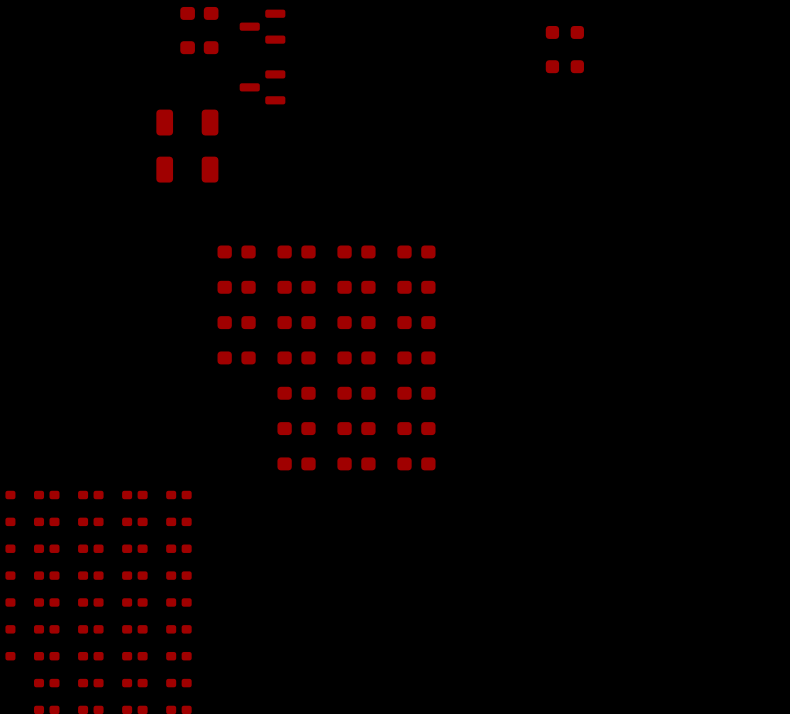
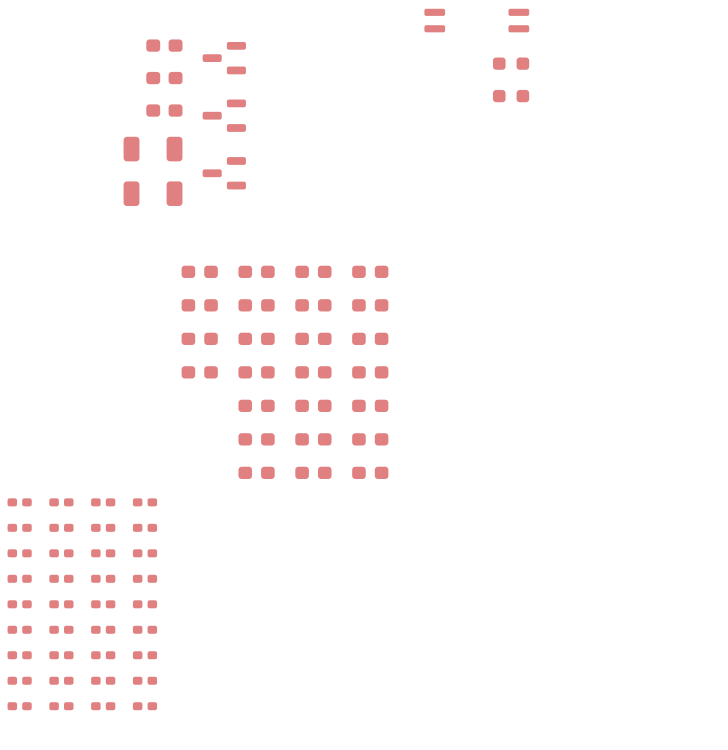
part: none -> (164, 110)
part: none -> (224, 173)

